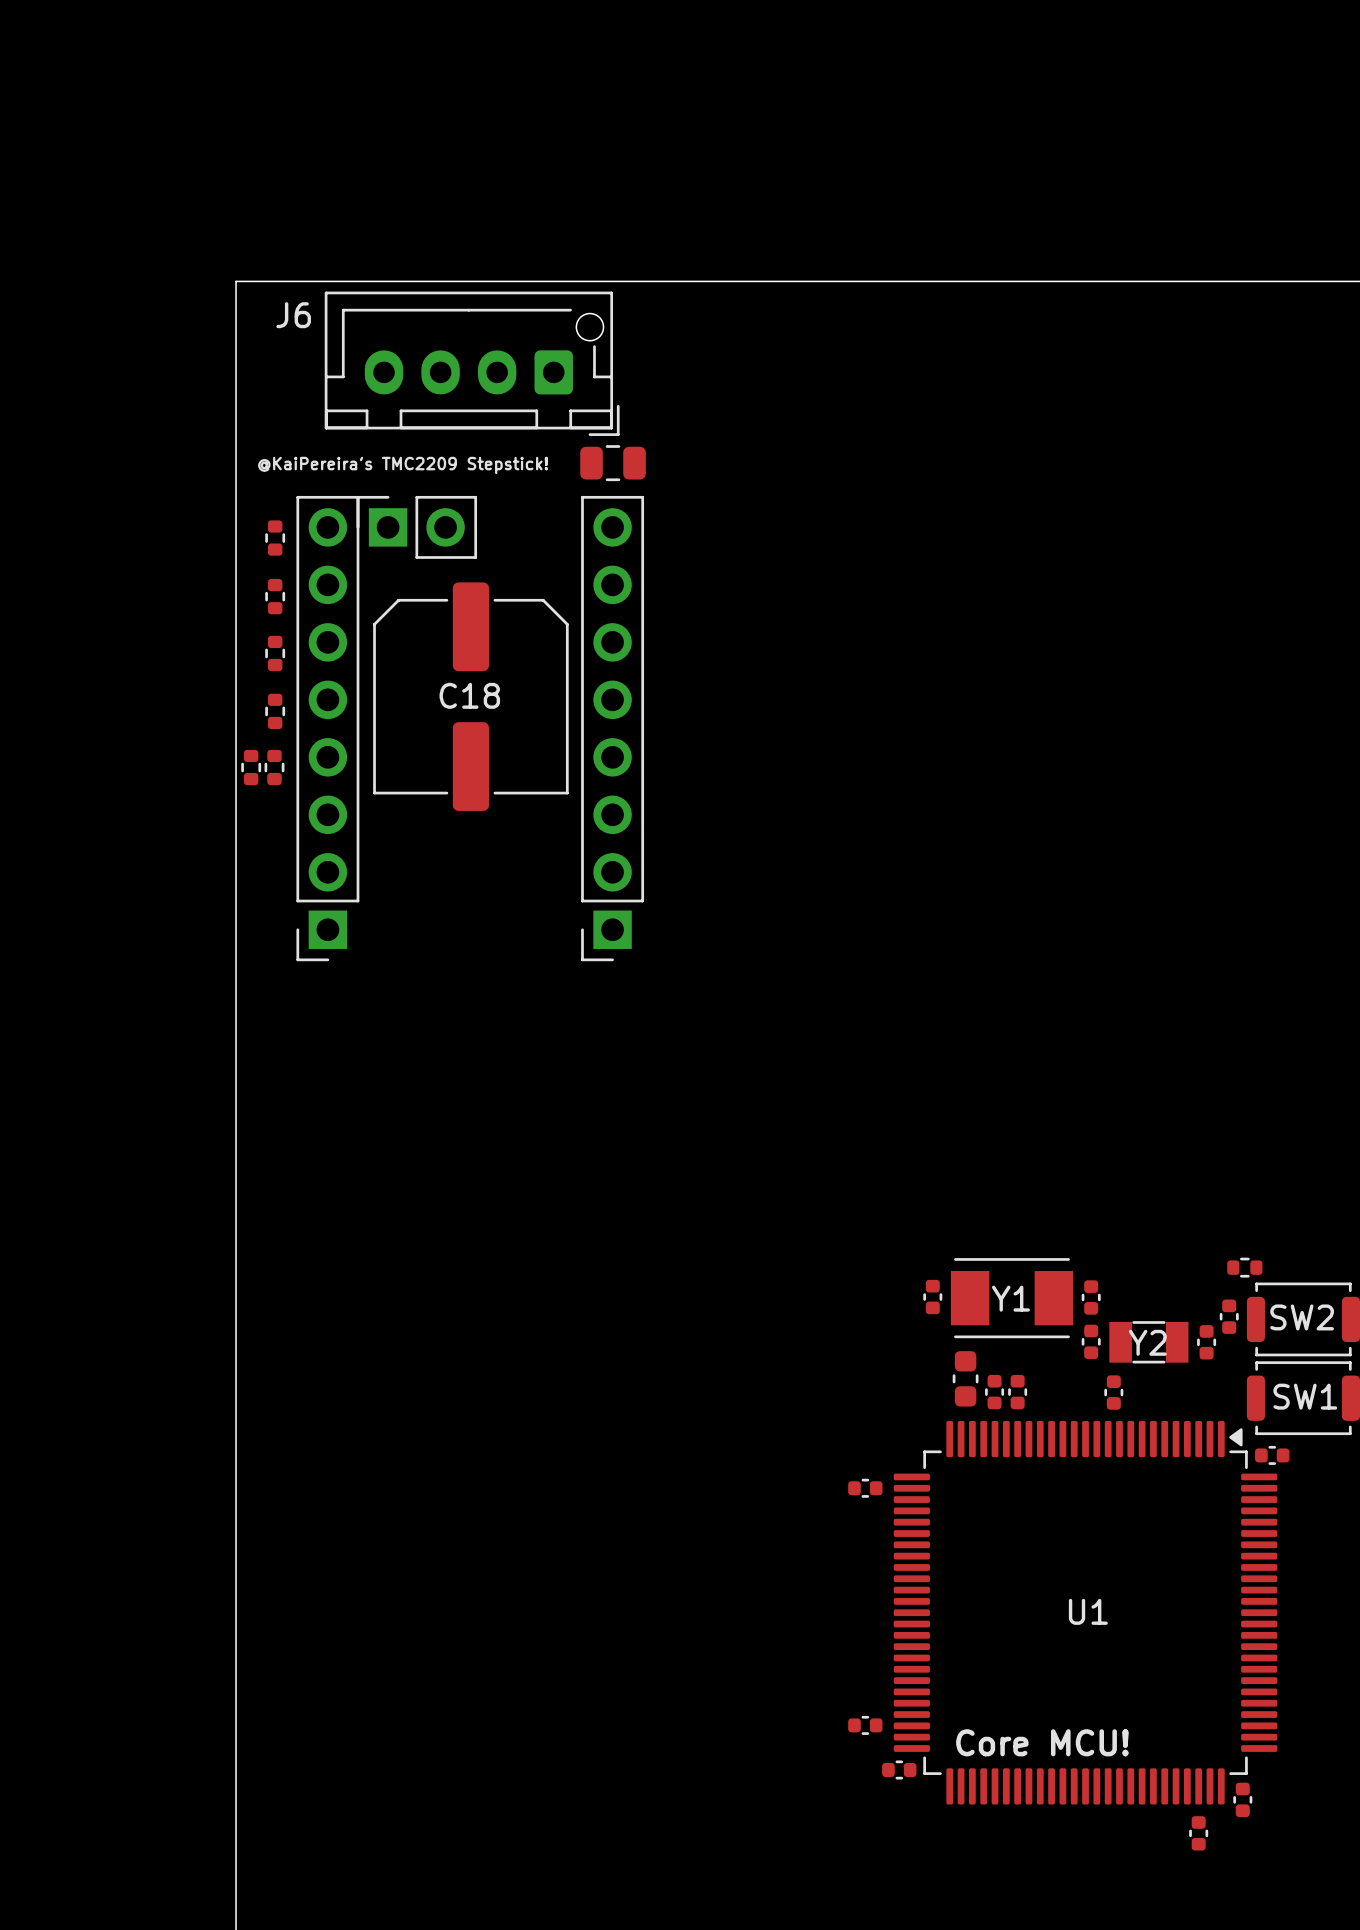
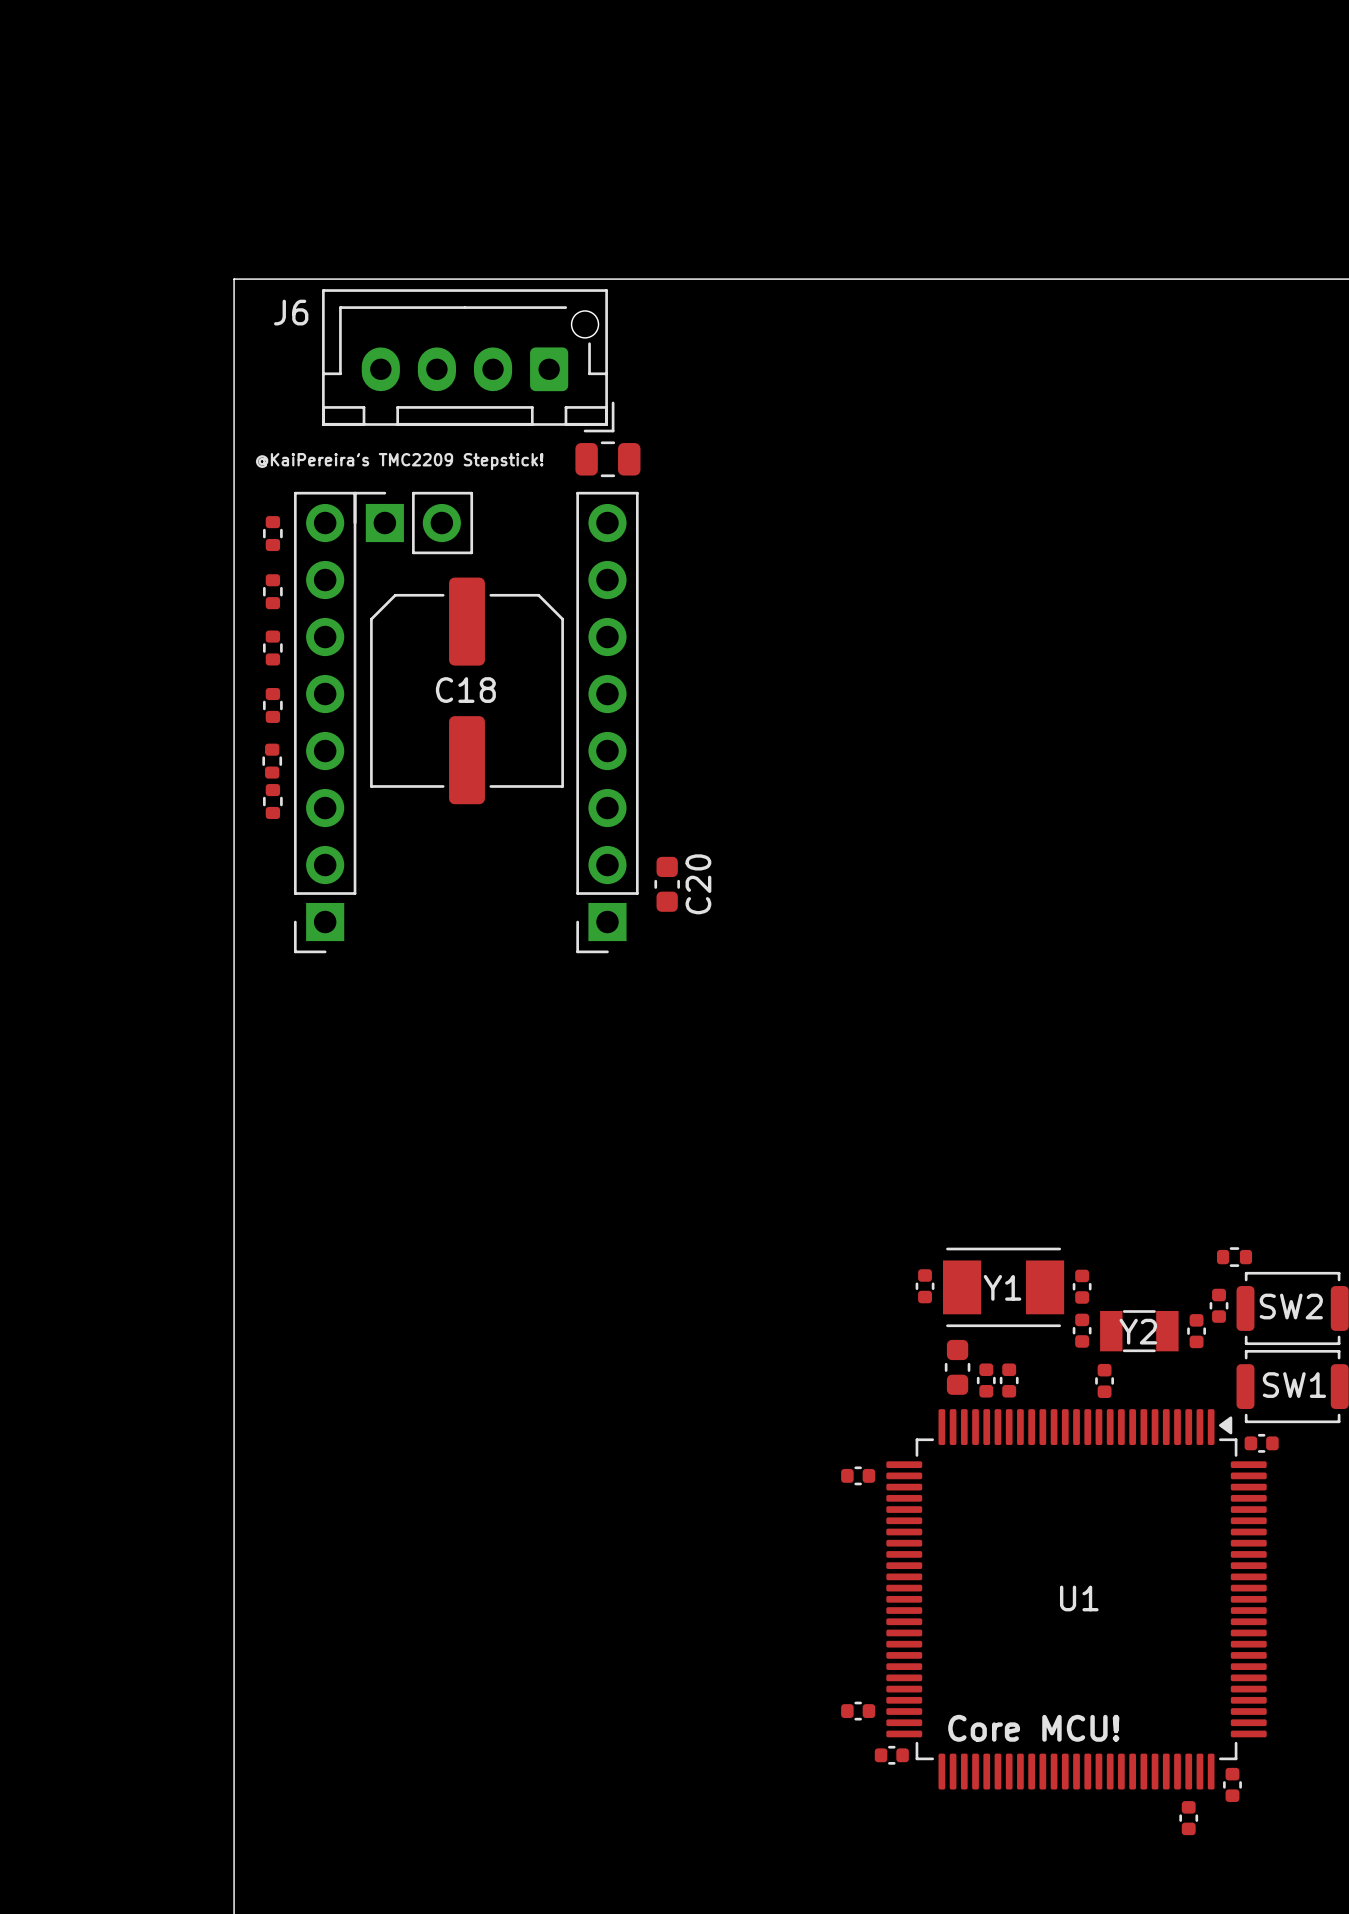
part position: (251, 767) -> (272, 801)
C20: none -> (667, 884)

